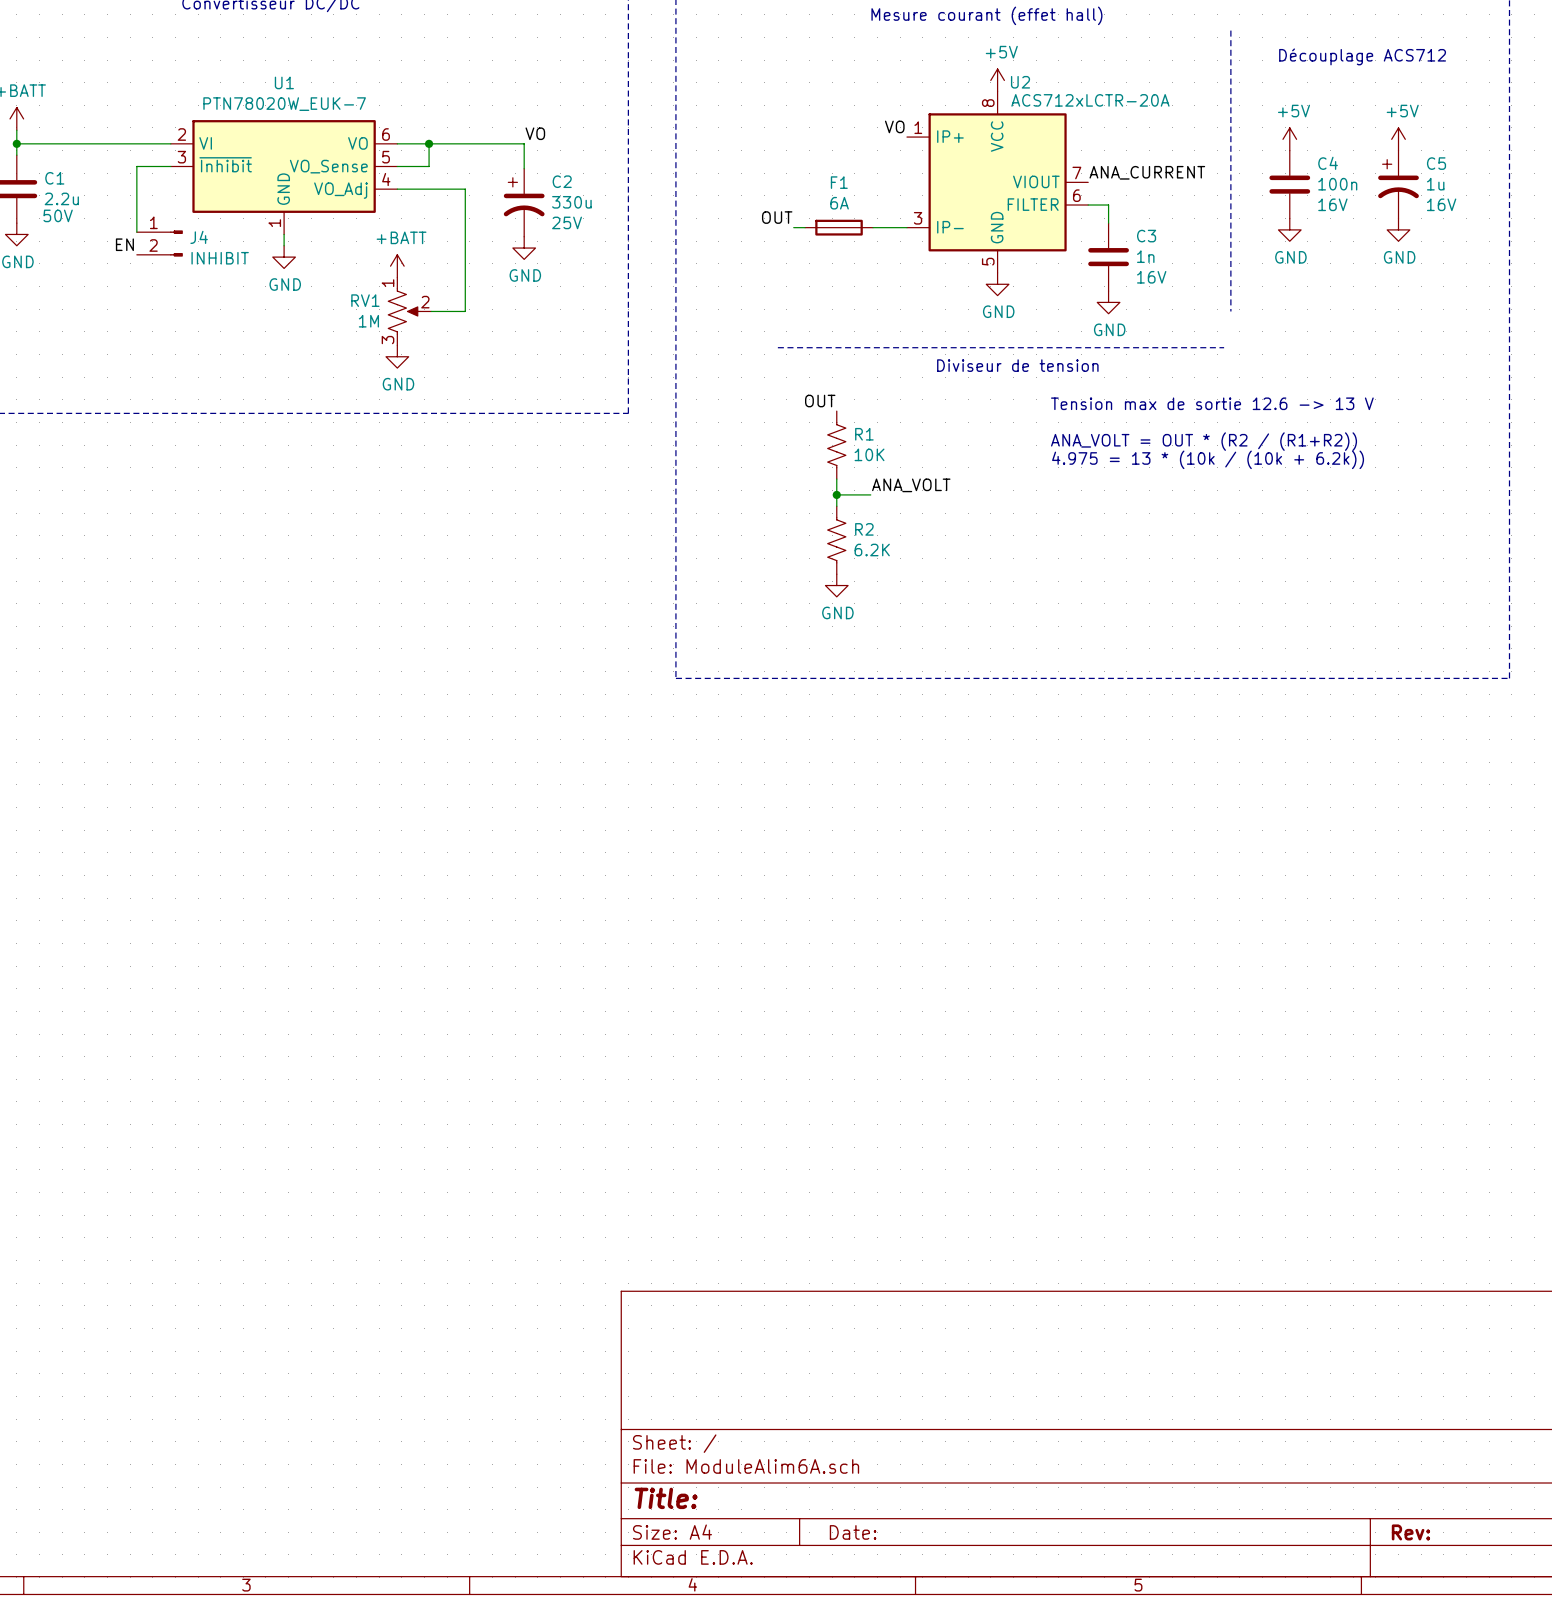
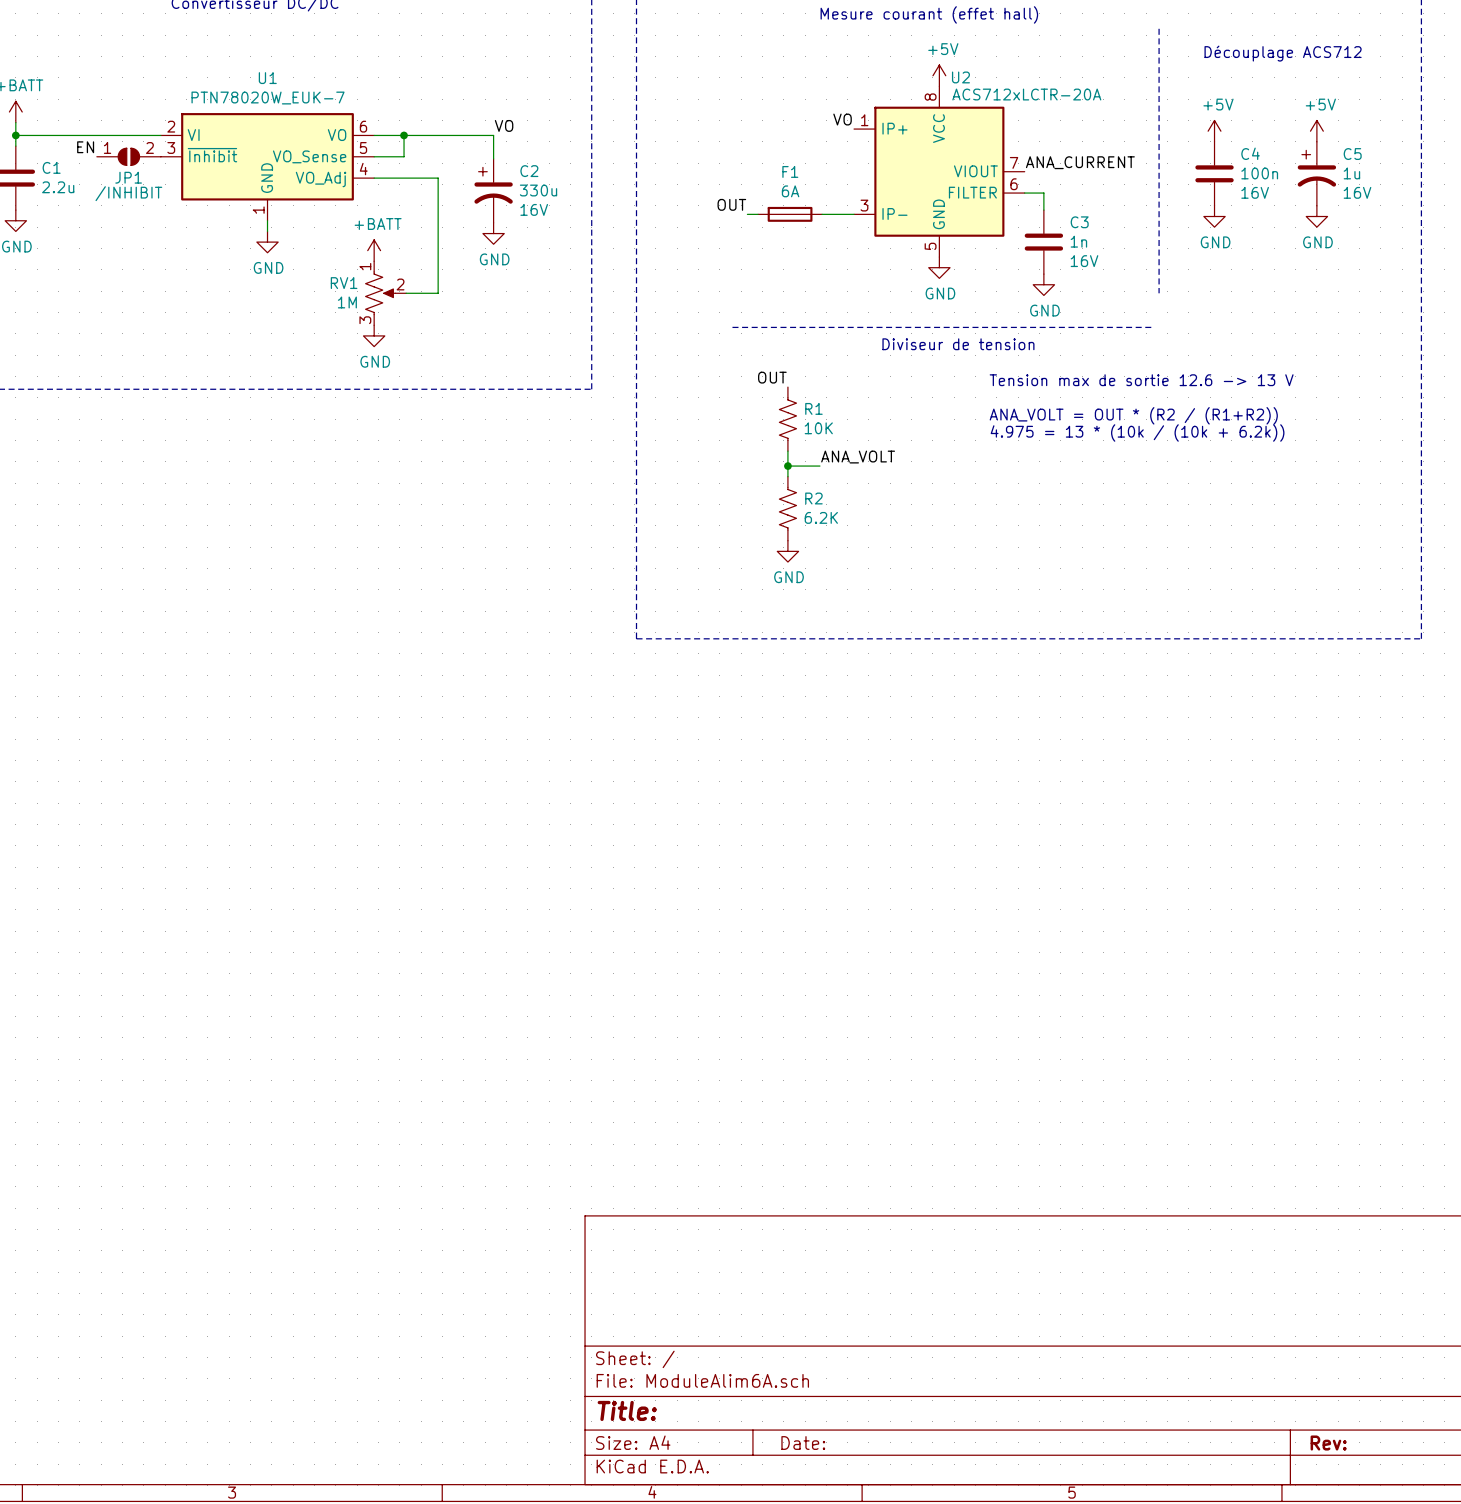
JP1: none -> /INHIBIT (128, 156)
wire: (170, 166) (136, 166) (136, 232) -> none
C1 text: 50V (58, 215) -> none
C2 text: 25V (567, 222) -> 16V (534, 209)
J4: INHIBIT (159, 243) -> none
label position: EN (124, 244) -> EN (85, 147)

